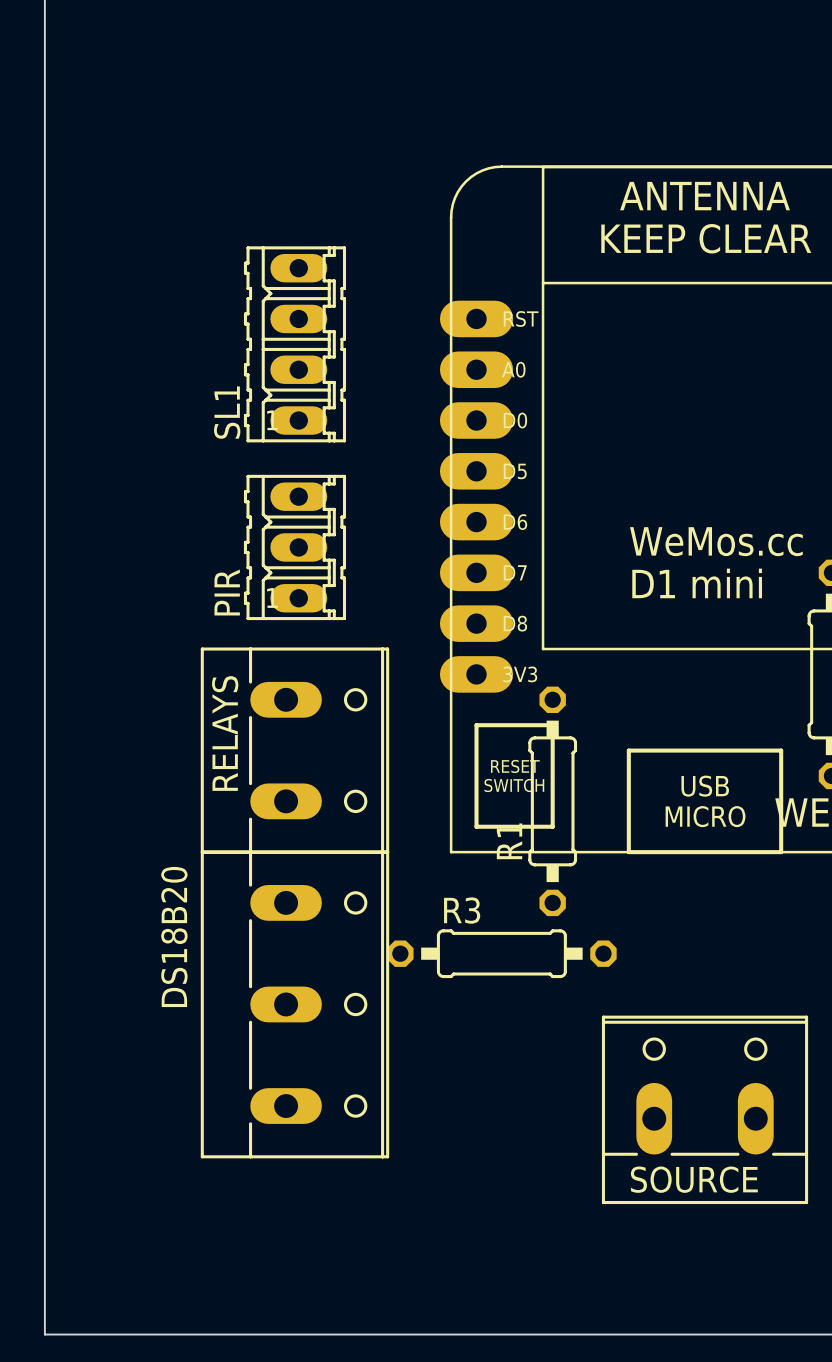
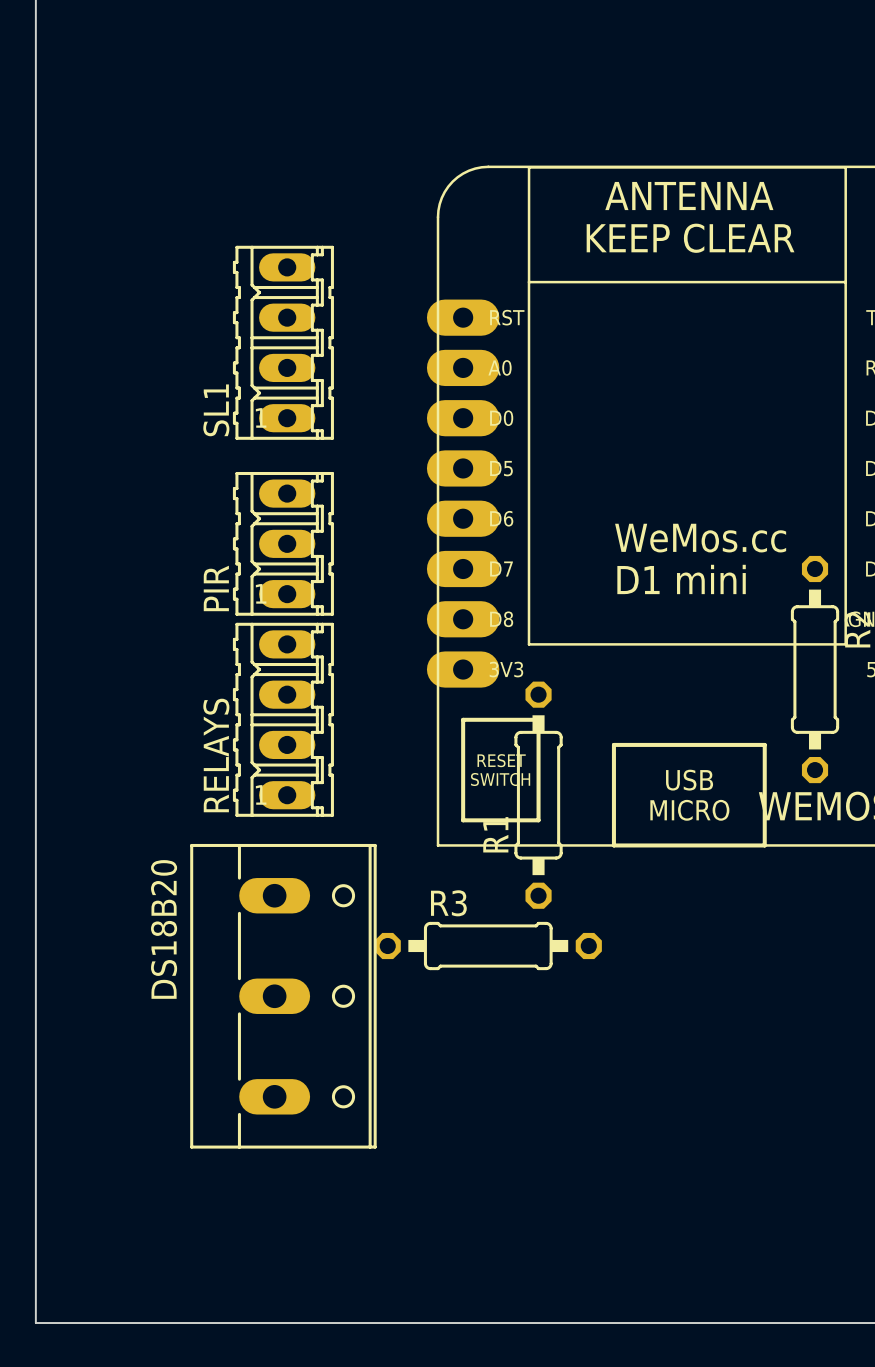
RELAYS: none -> (283, 719)
RELAYS: (294, 750) -> none
SOURCE: (705, 1109) -> none

